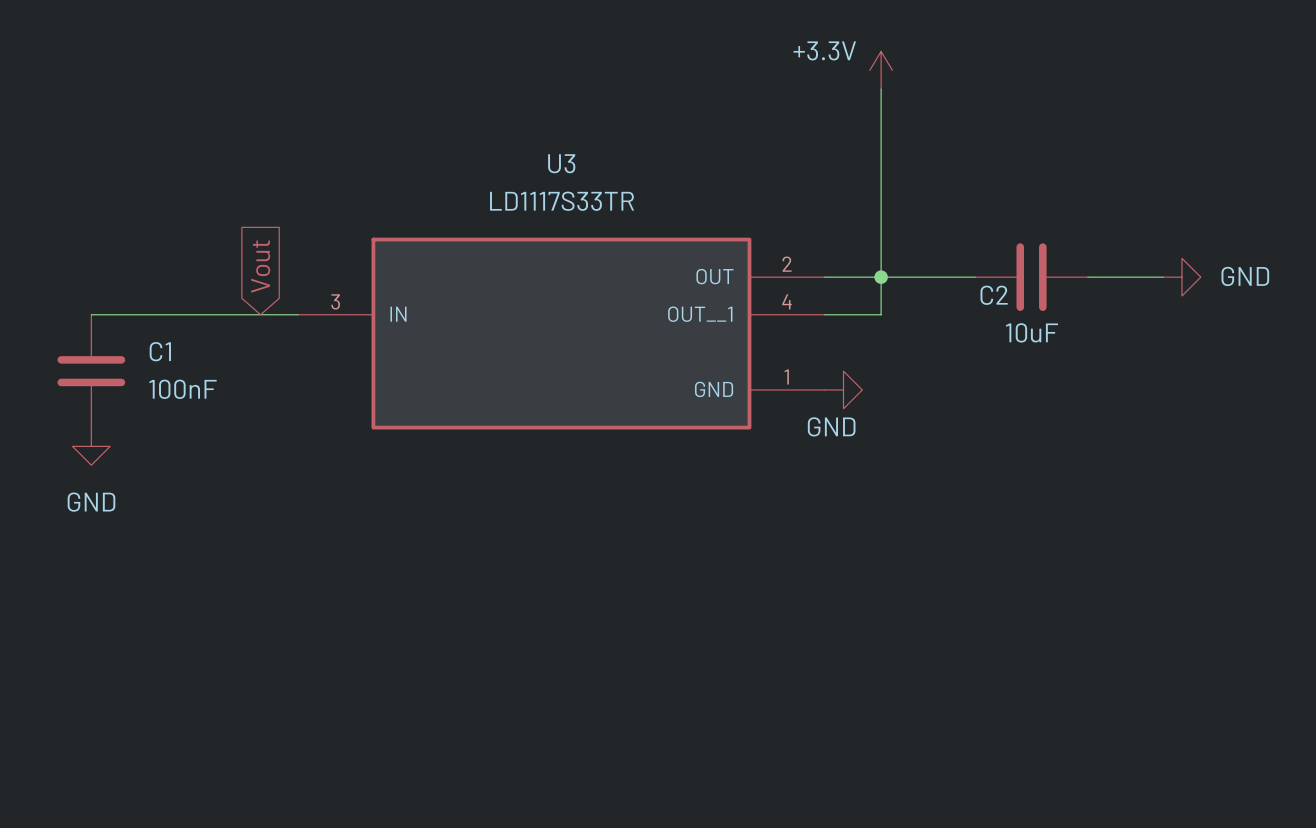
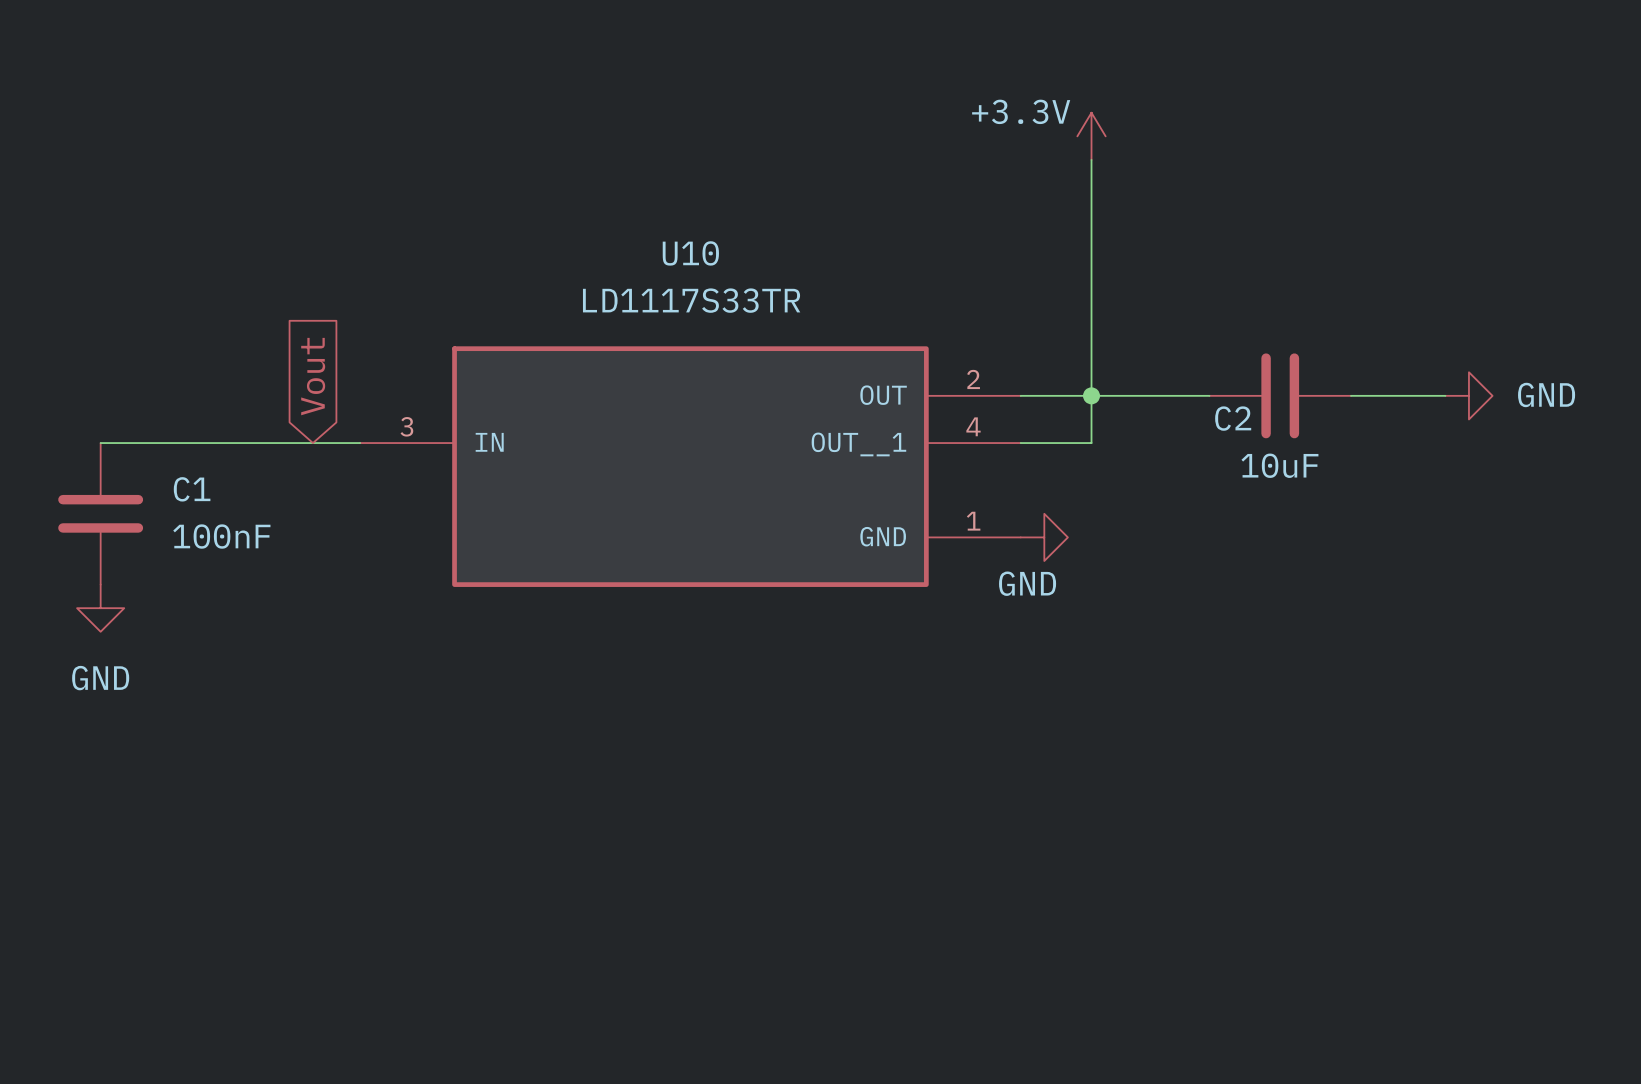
U3 name: U3 (561, 163) -> U10 (690, 253)

